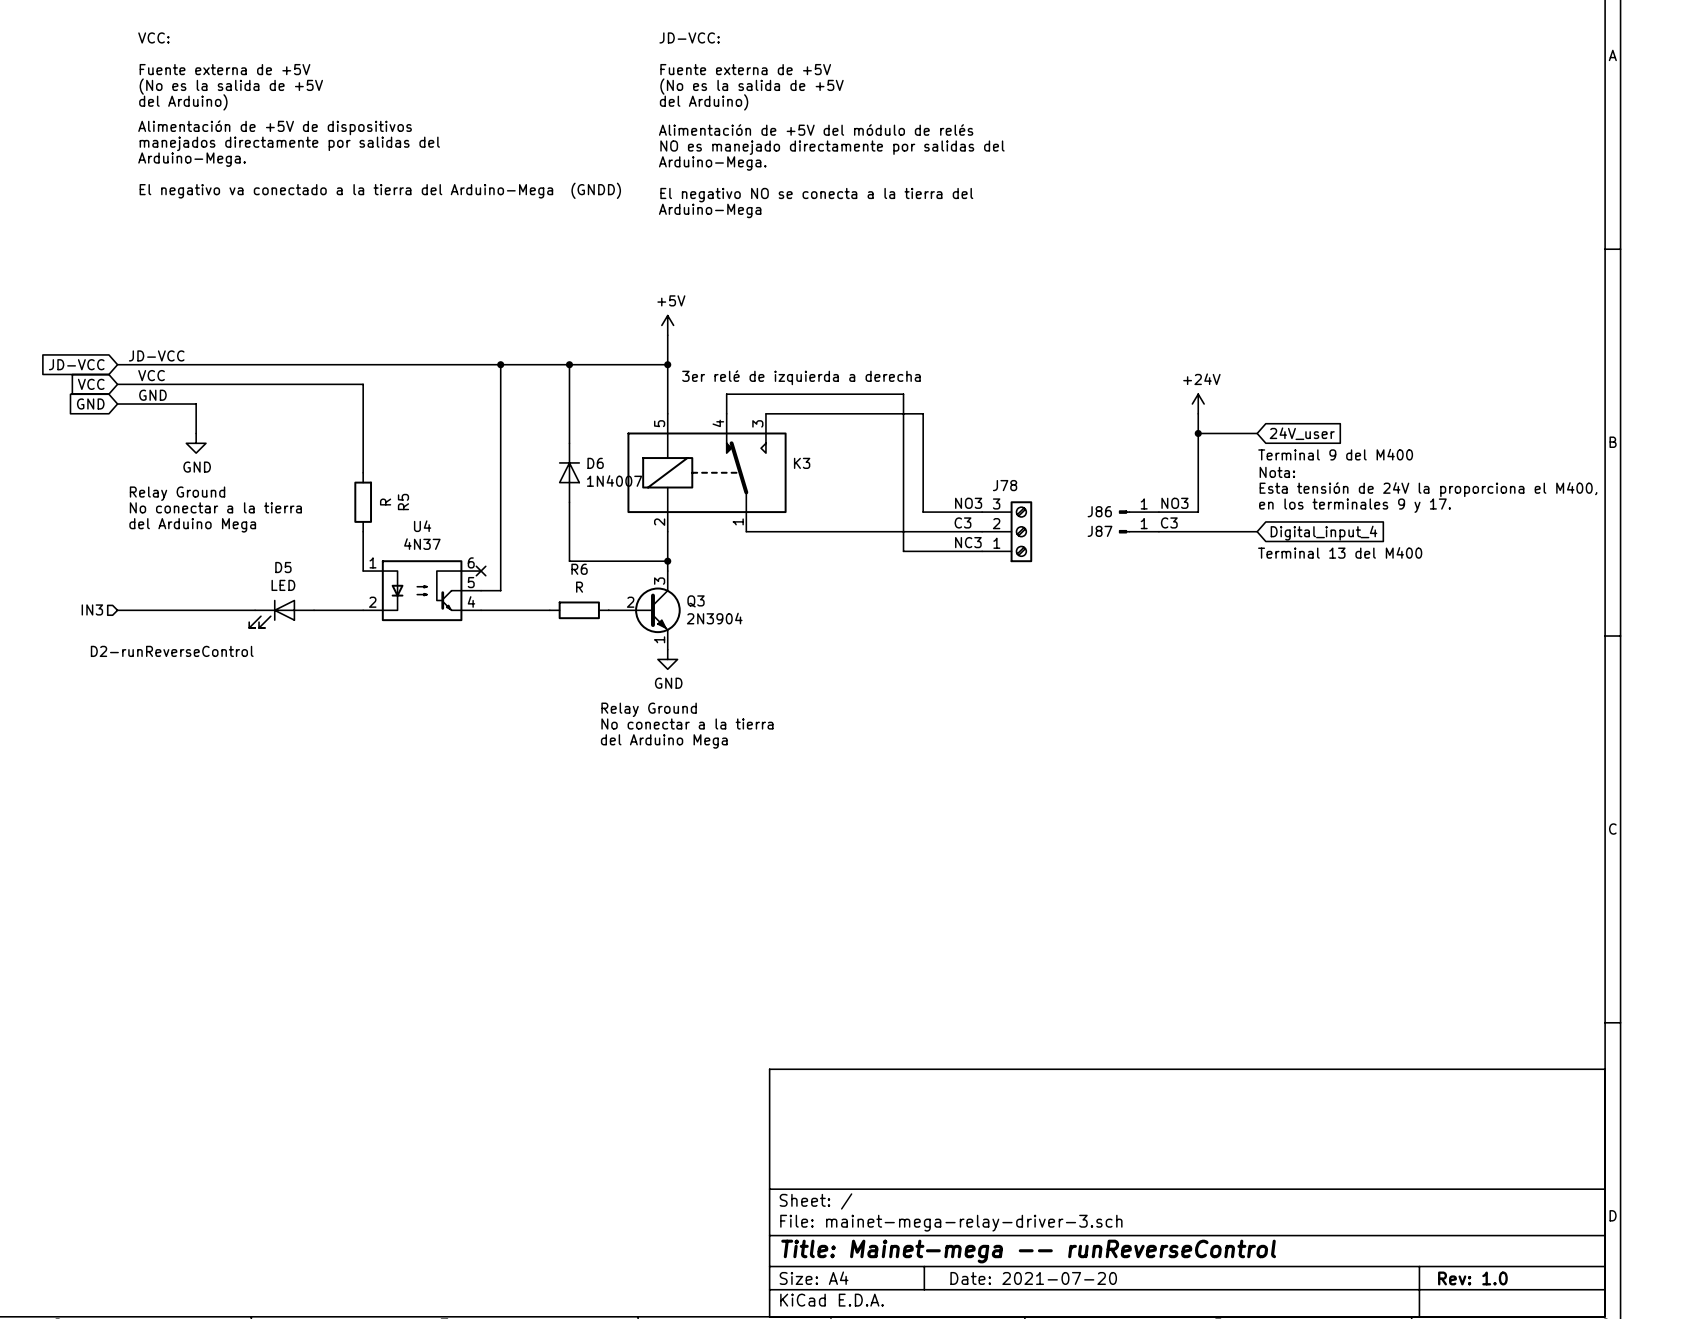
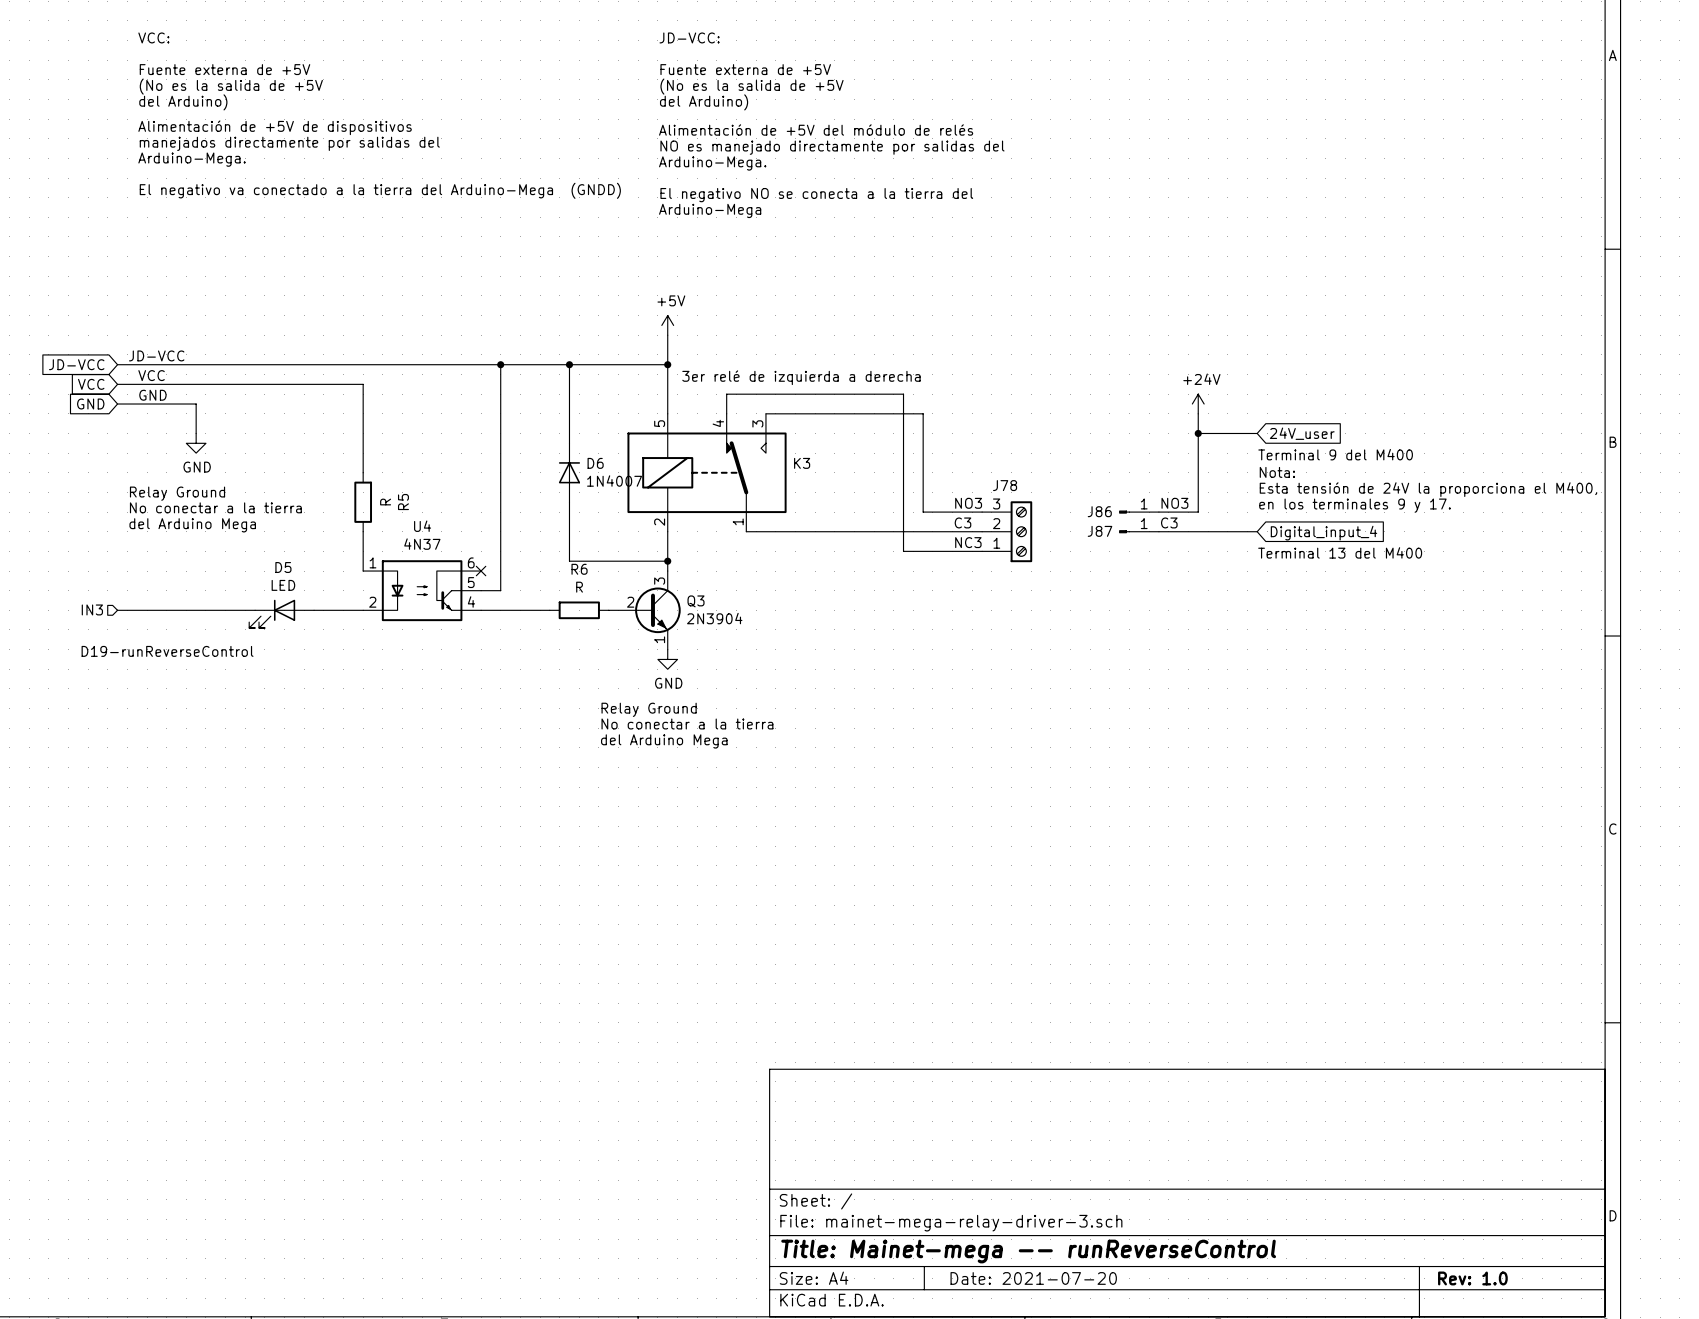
text: D2-runReverseControl (172, 651) -> D19-runReverseControl (167, 651)

